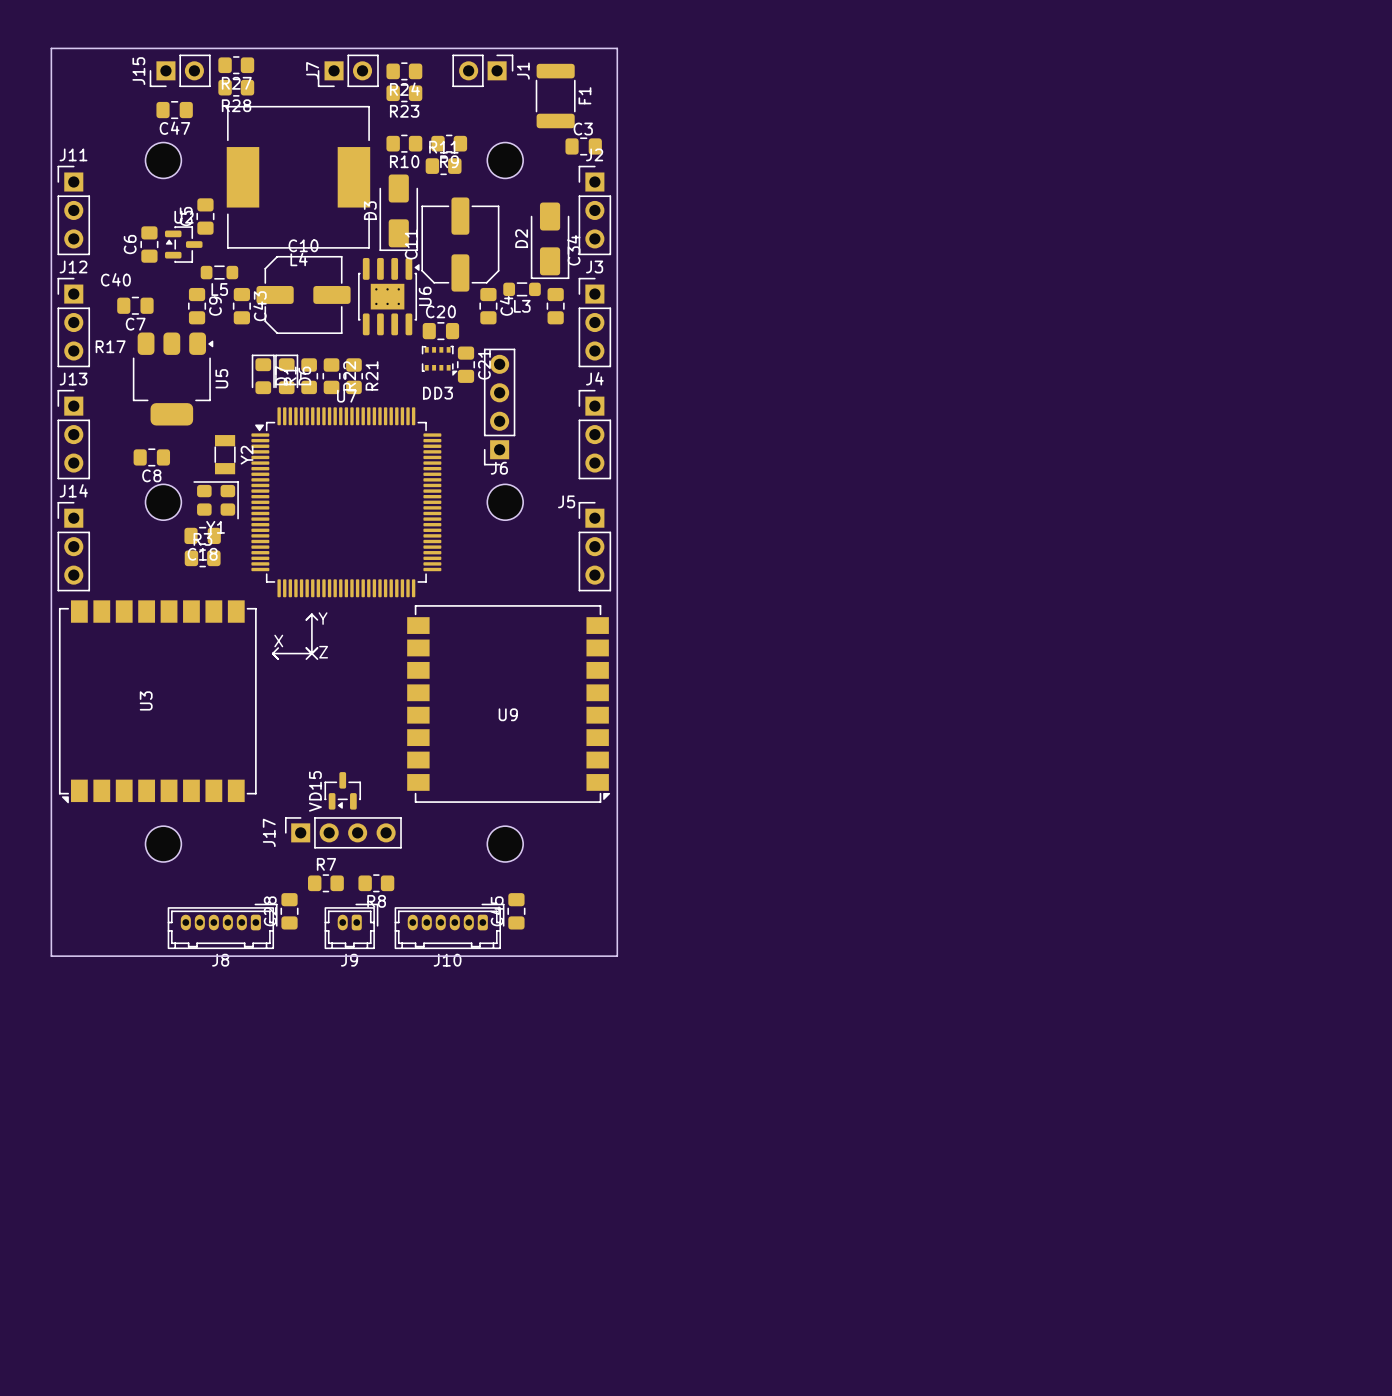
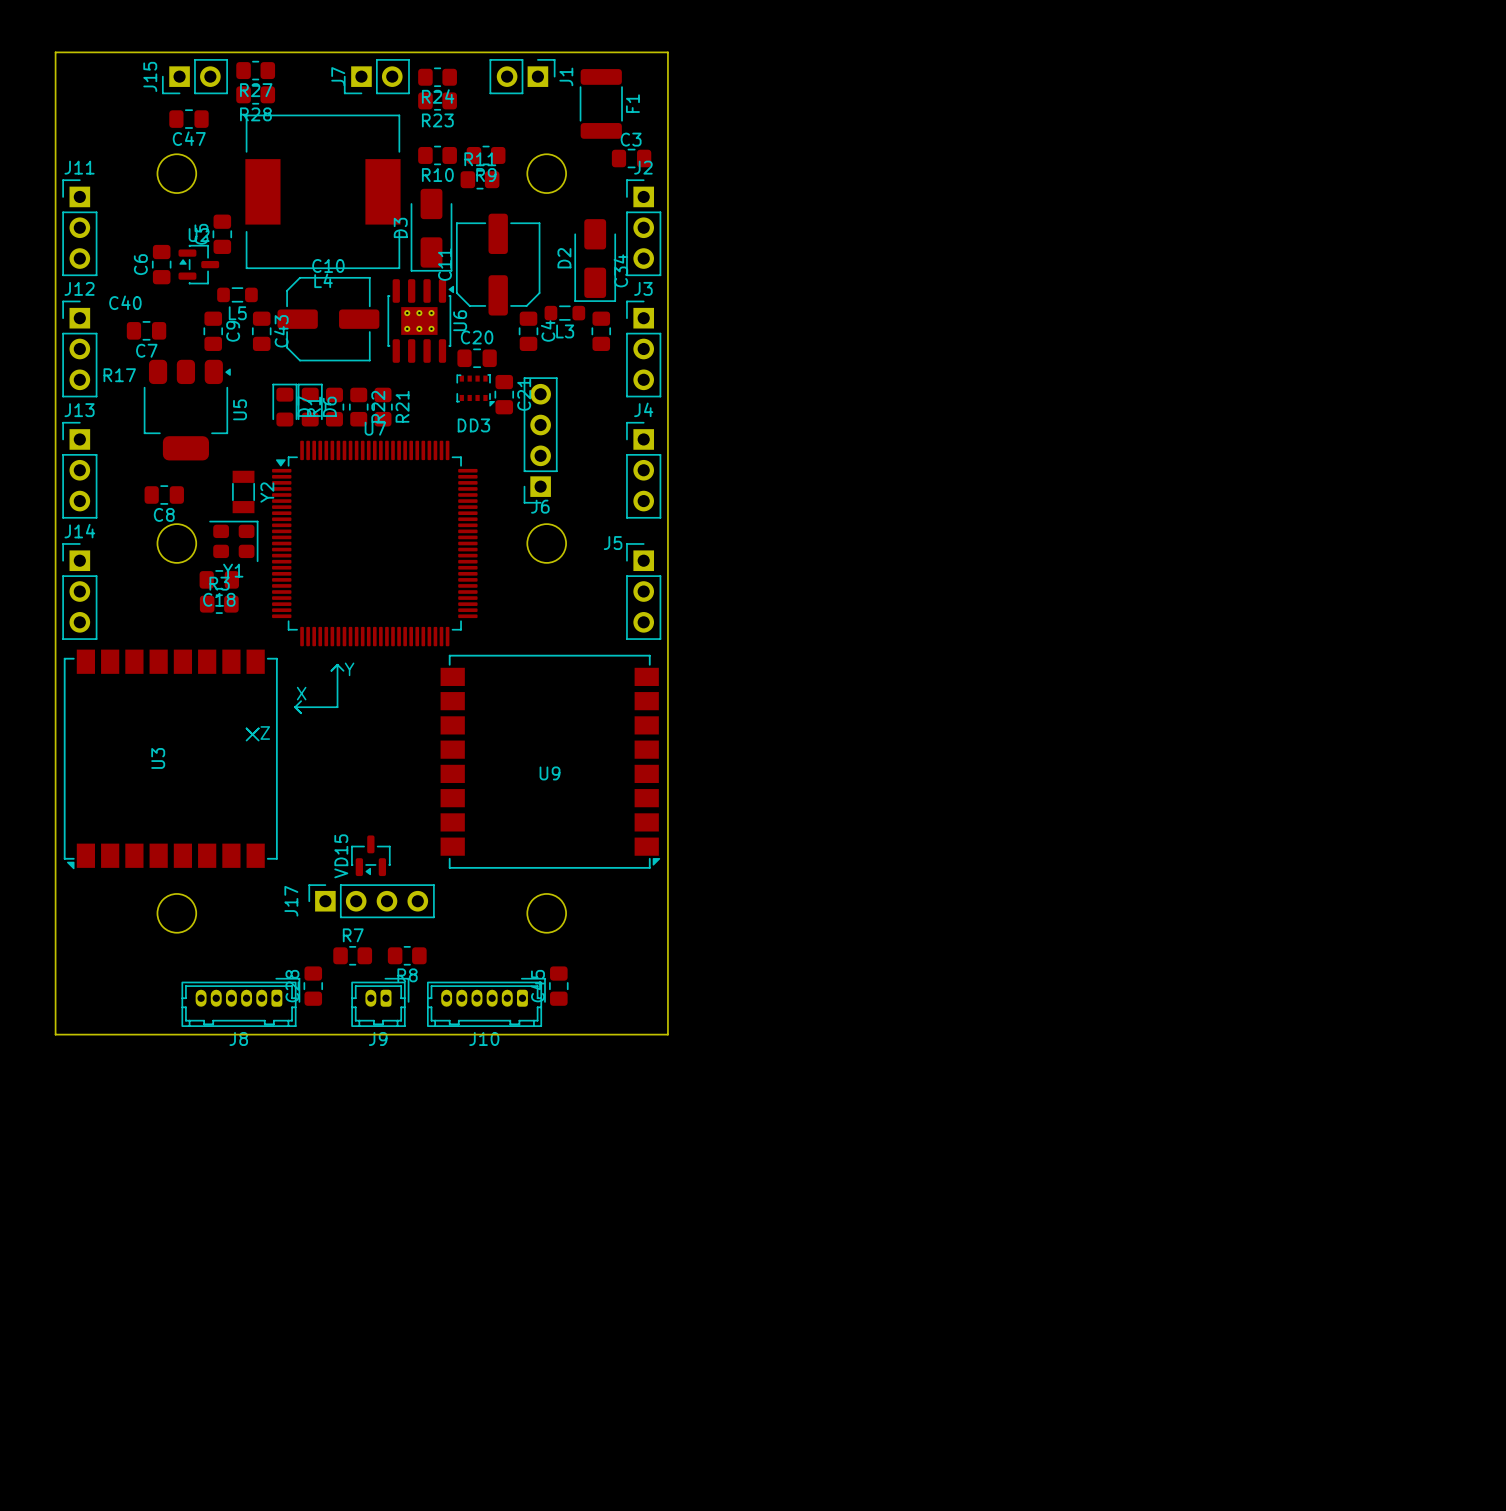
line: (306, 647) (317, 659) -> (246, 728) (258, 740)
line: (317, 647) (306, 659) -> (258, 728) (246, 740)
text position: Z (323, 652) -> Z (265, 733)

